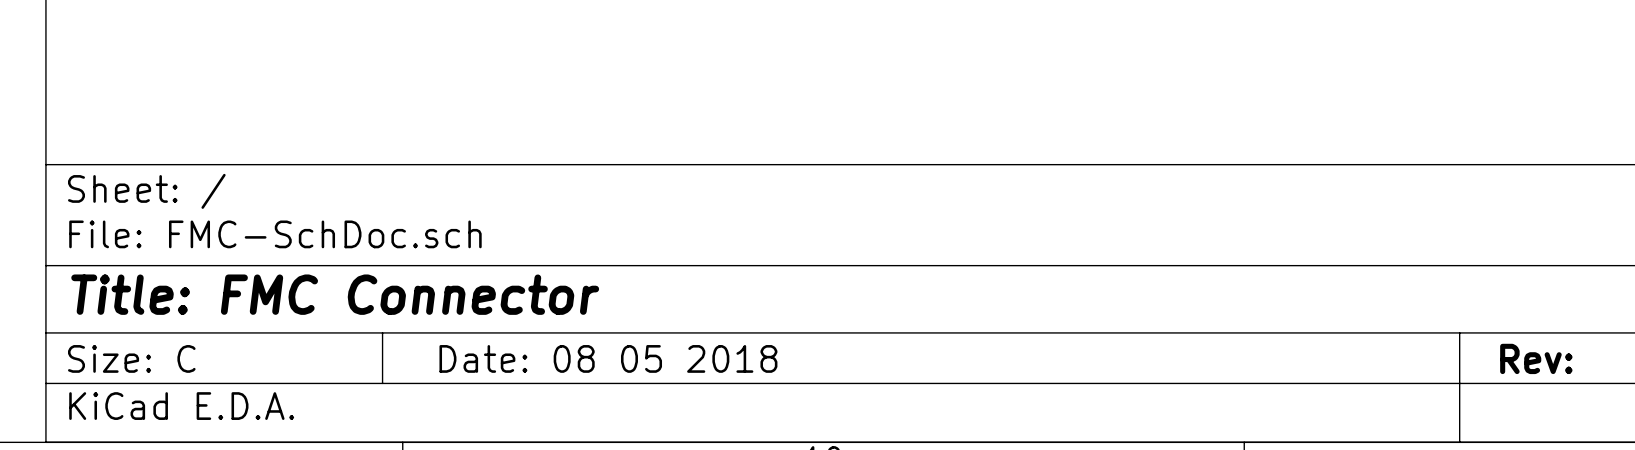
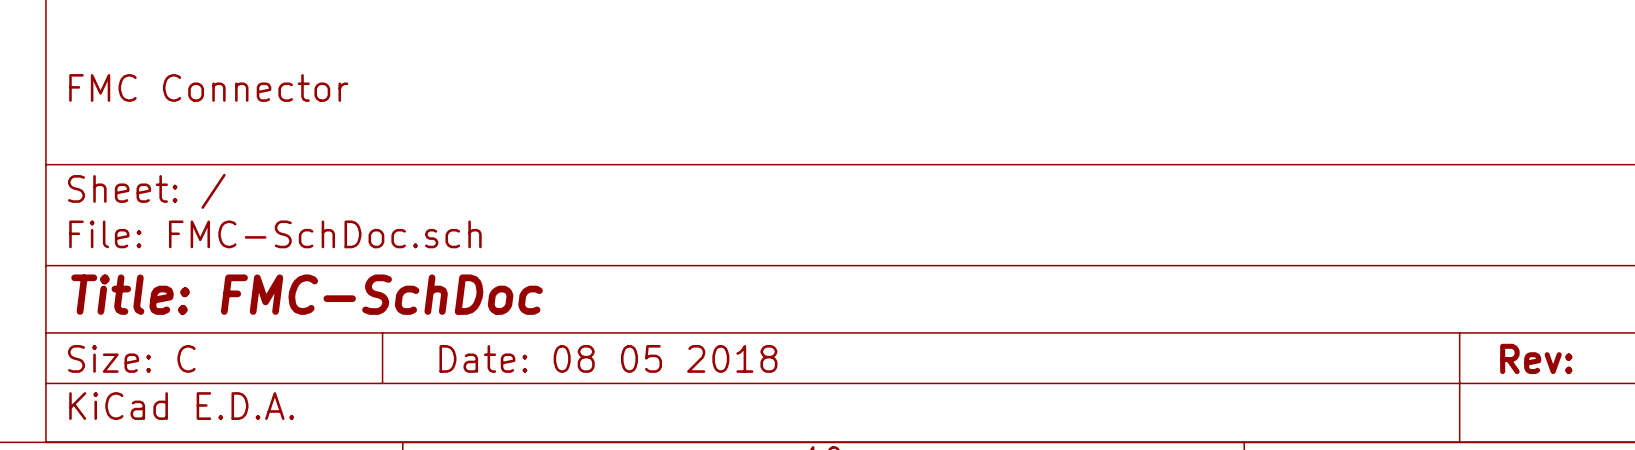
title block: none -> FMC Connector (208, 87)
title block: Title: FMC Connector (335, 294) -> Title: FMC-SchDoc (307, 294)

